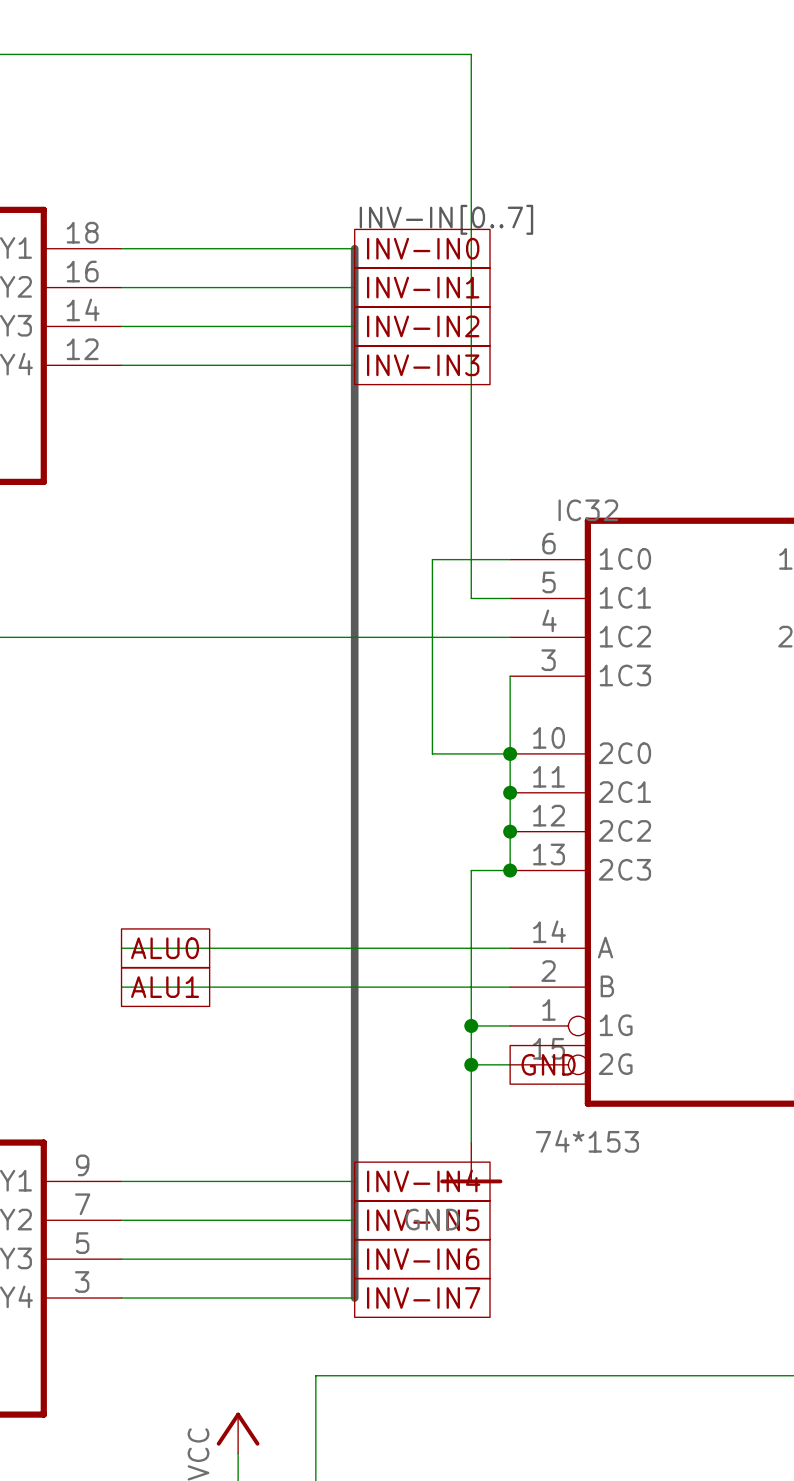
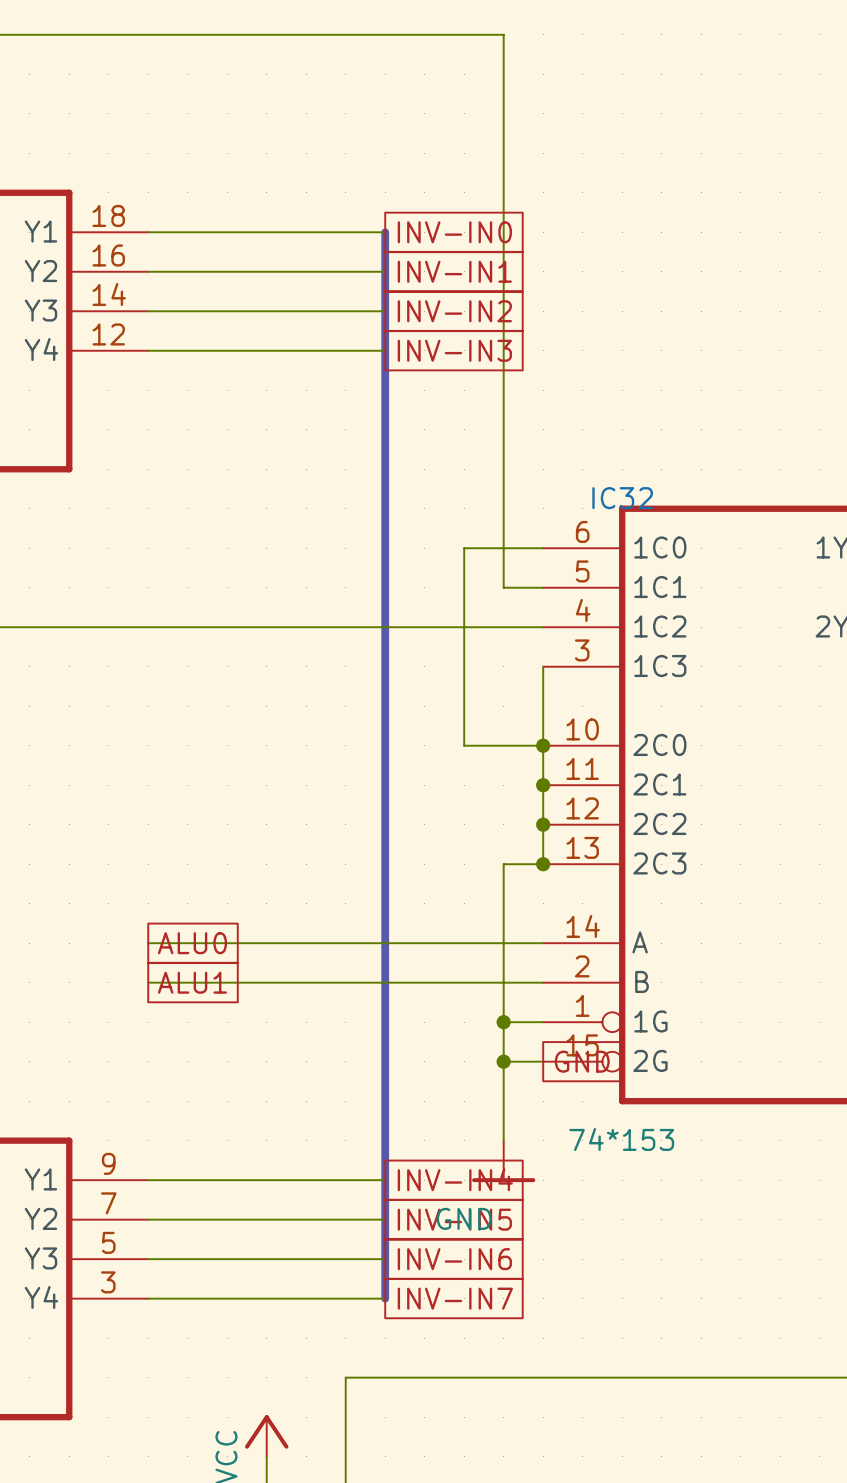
text: INV-IN[0..7] (446, 219) -> none

